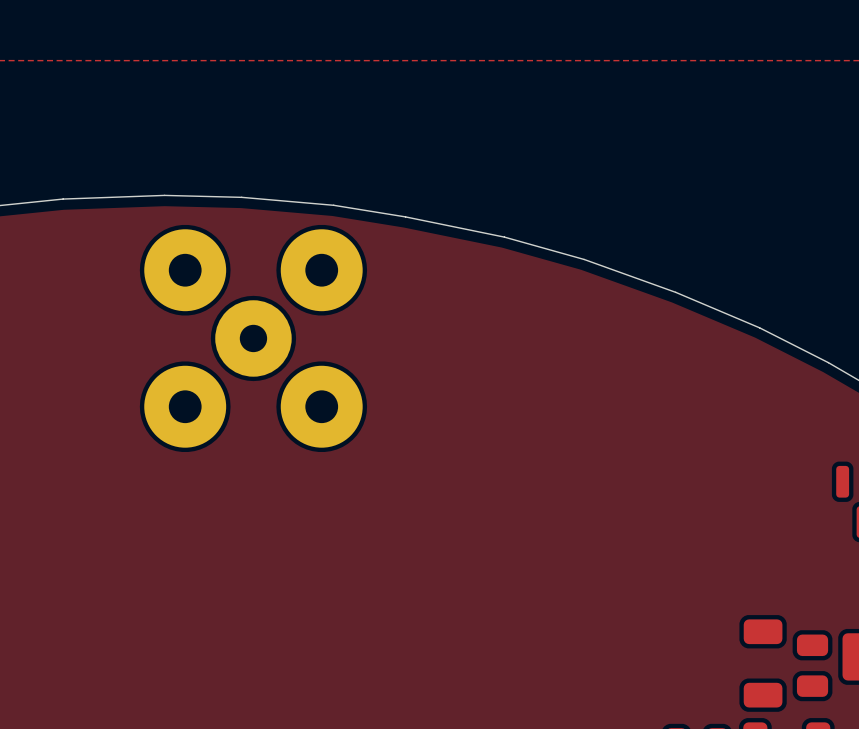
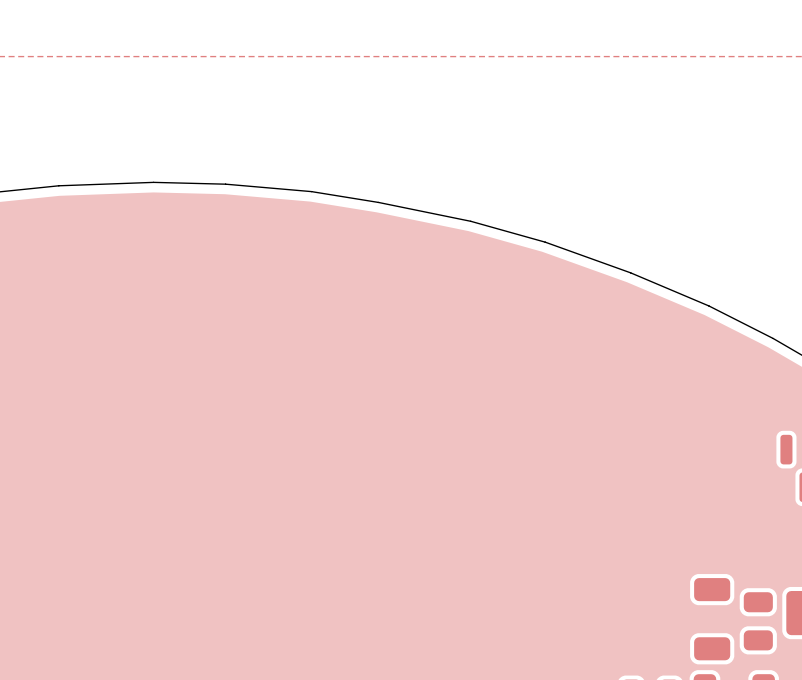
part: (253, 338) -> none

